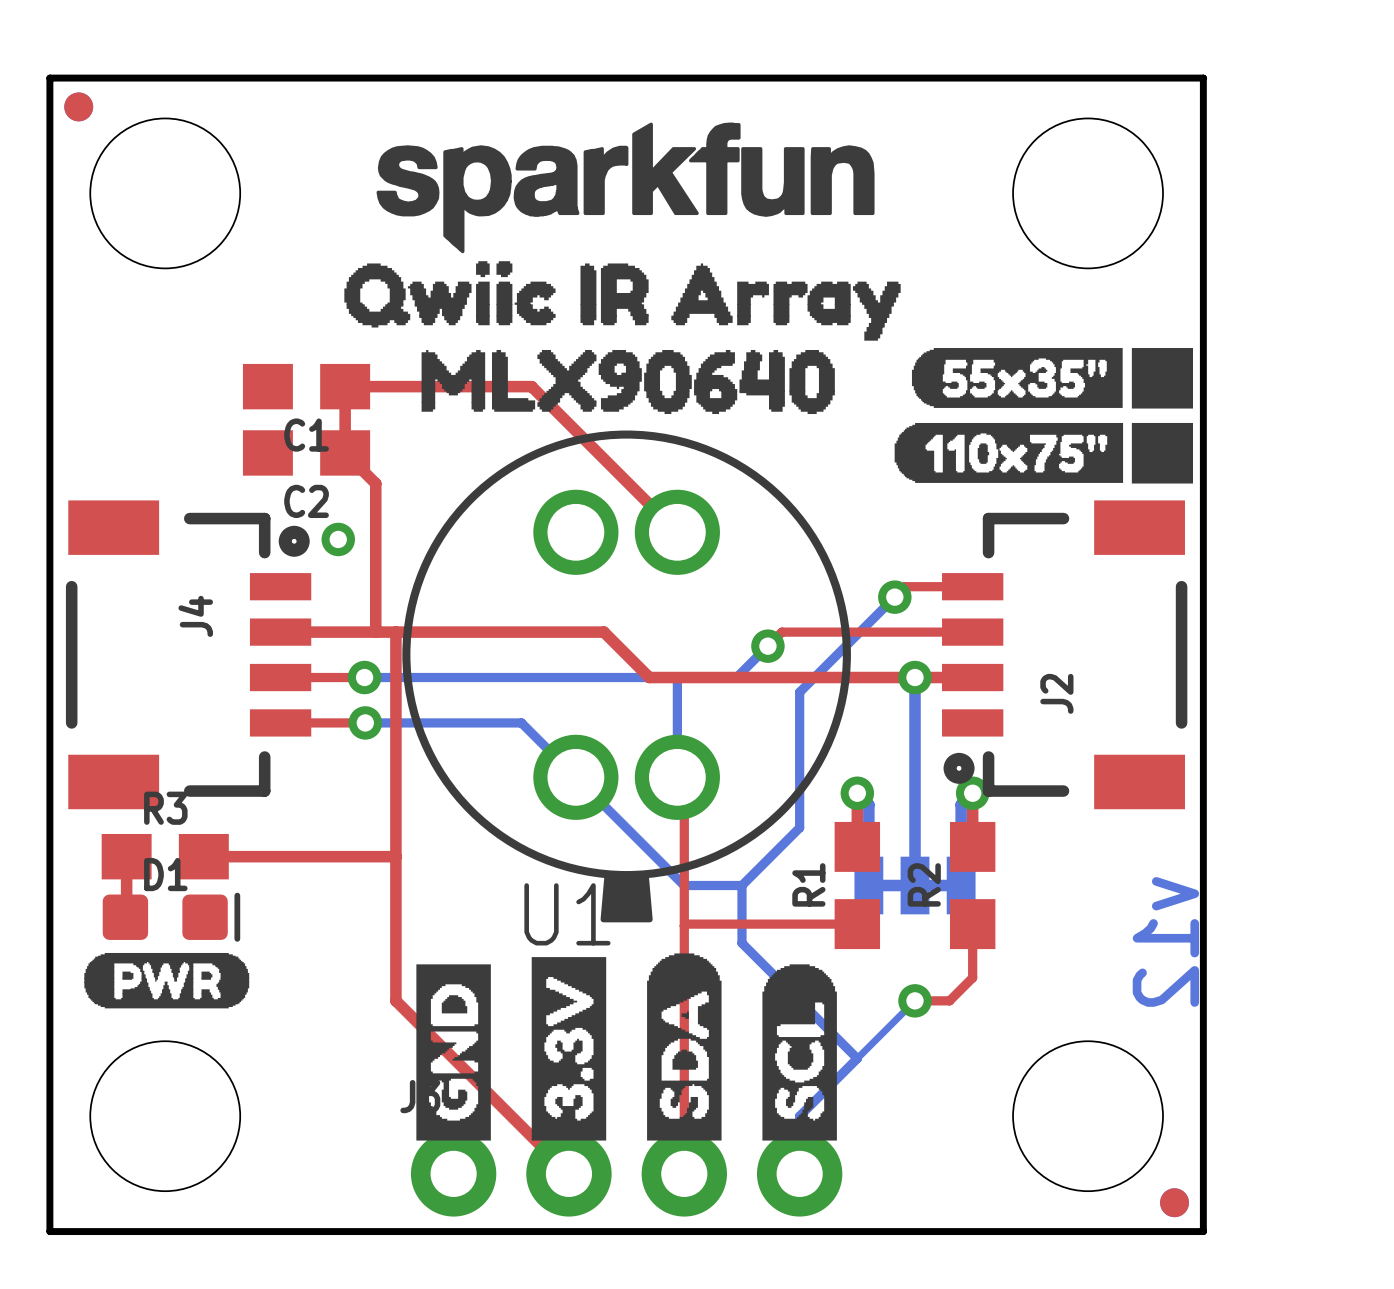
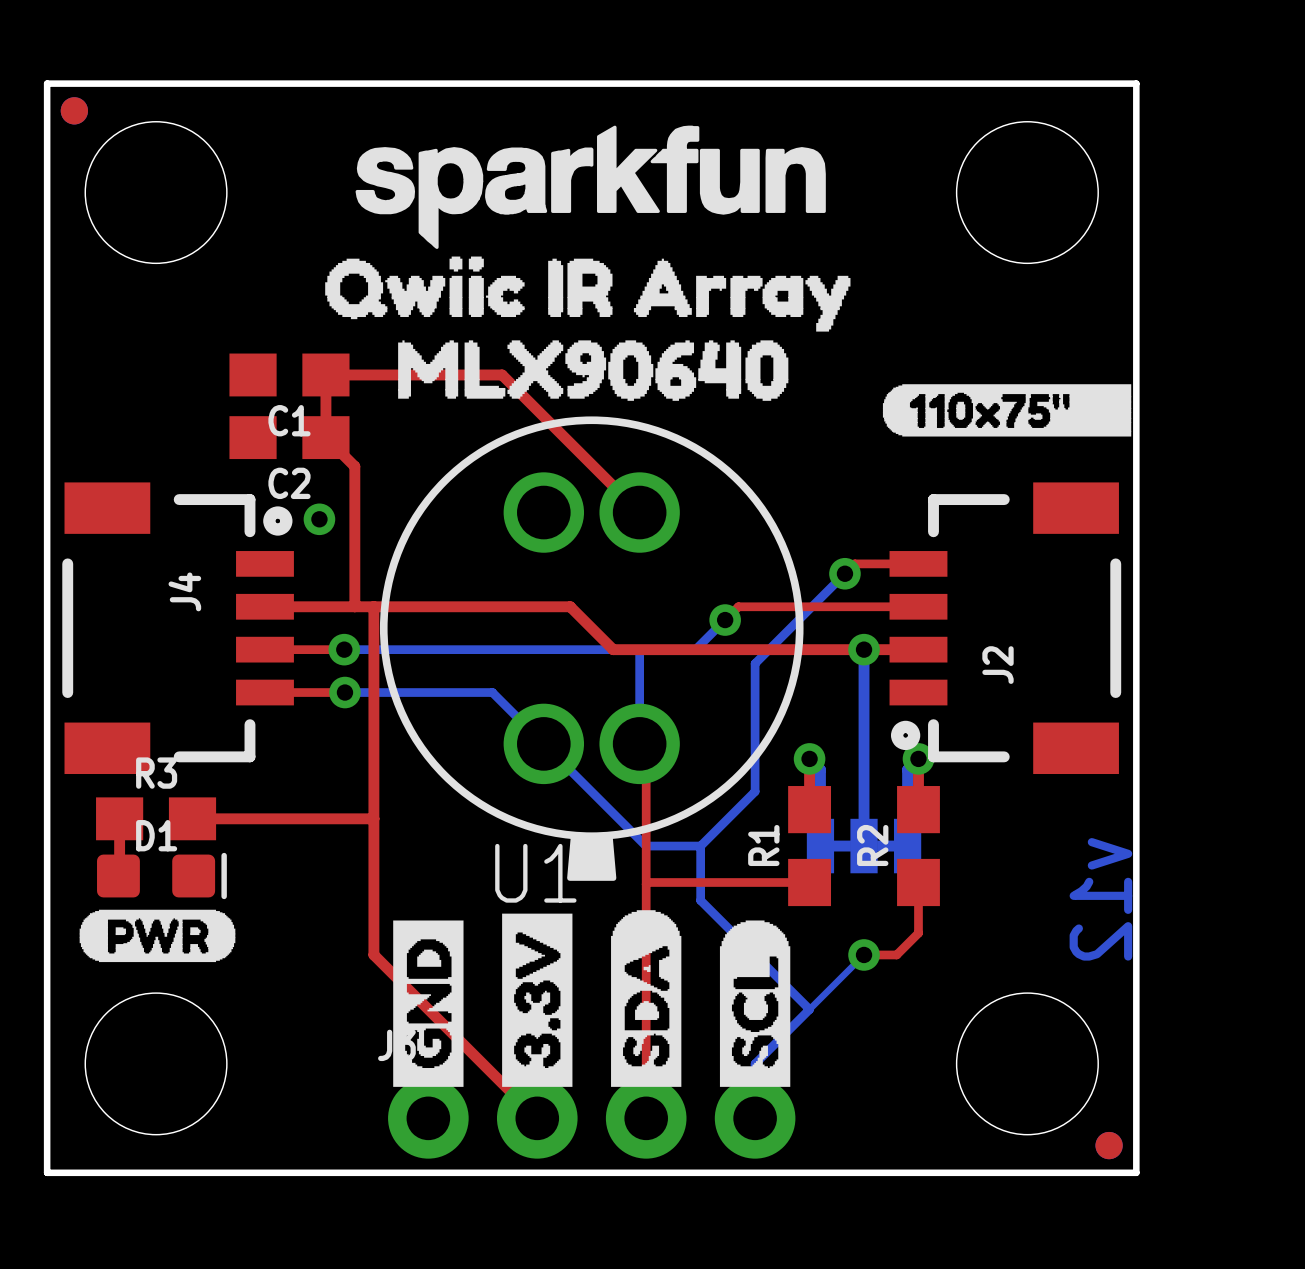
drawing: [894, 347, 1193, 484] -> none
drawing: none -> [882, 384, 1132, 437]

